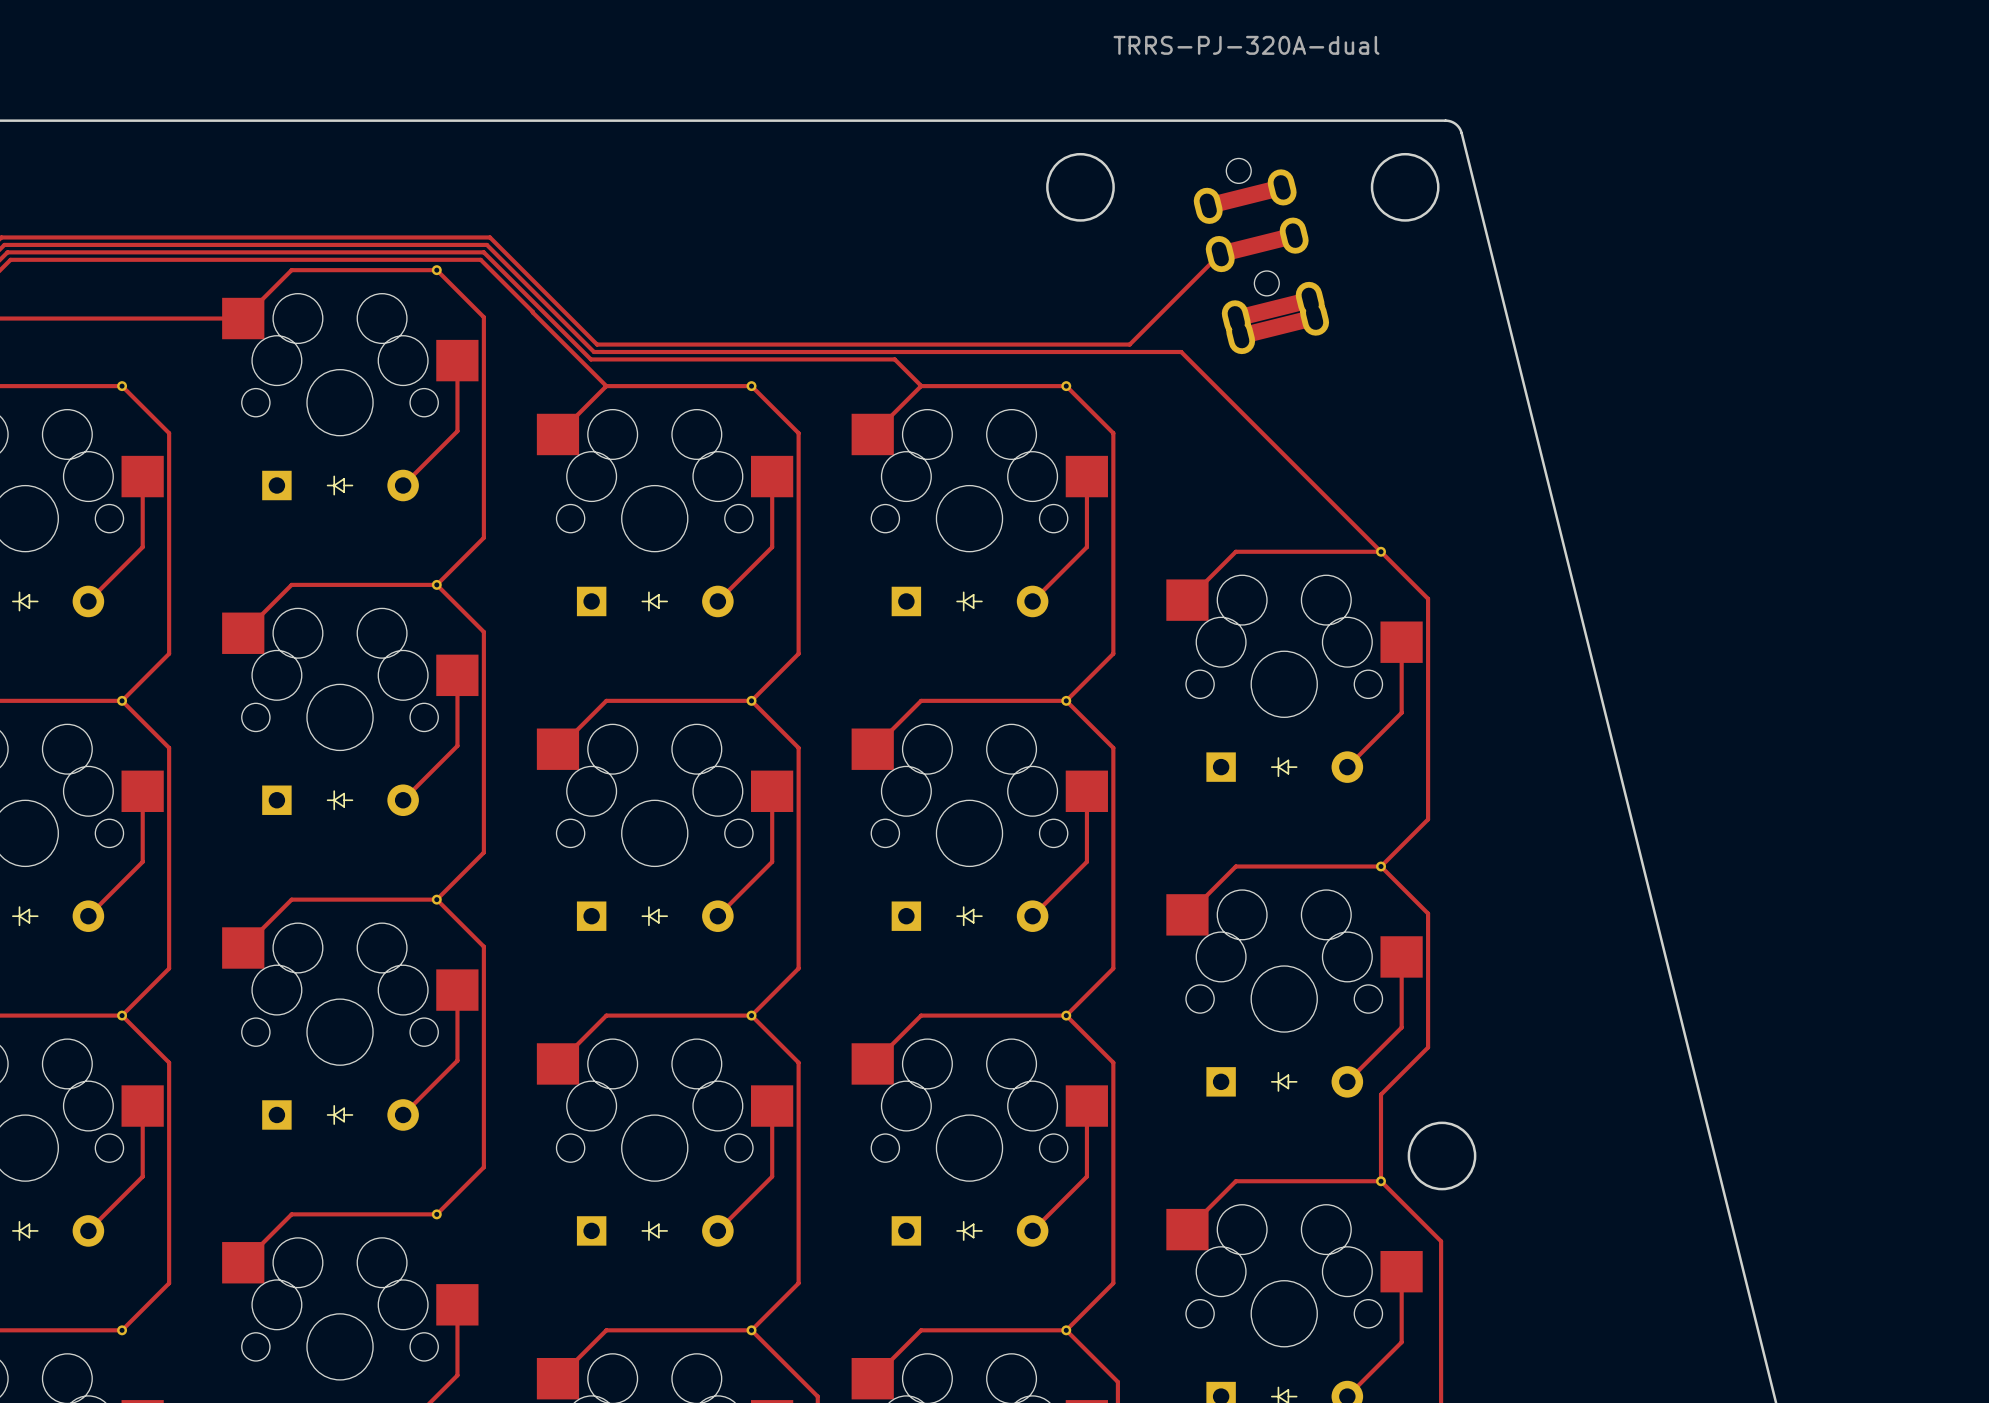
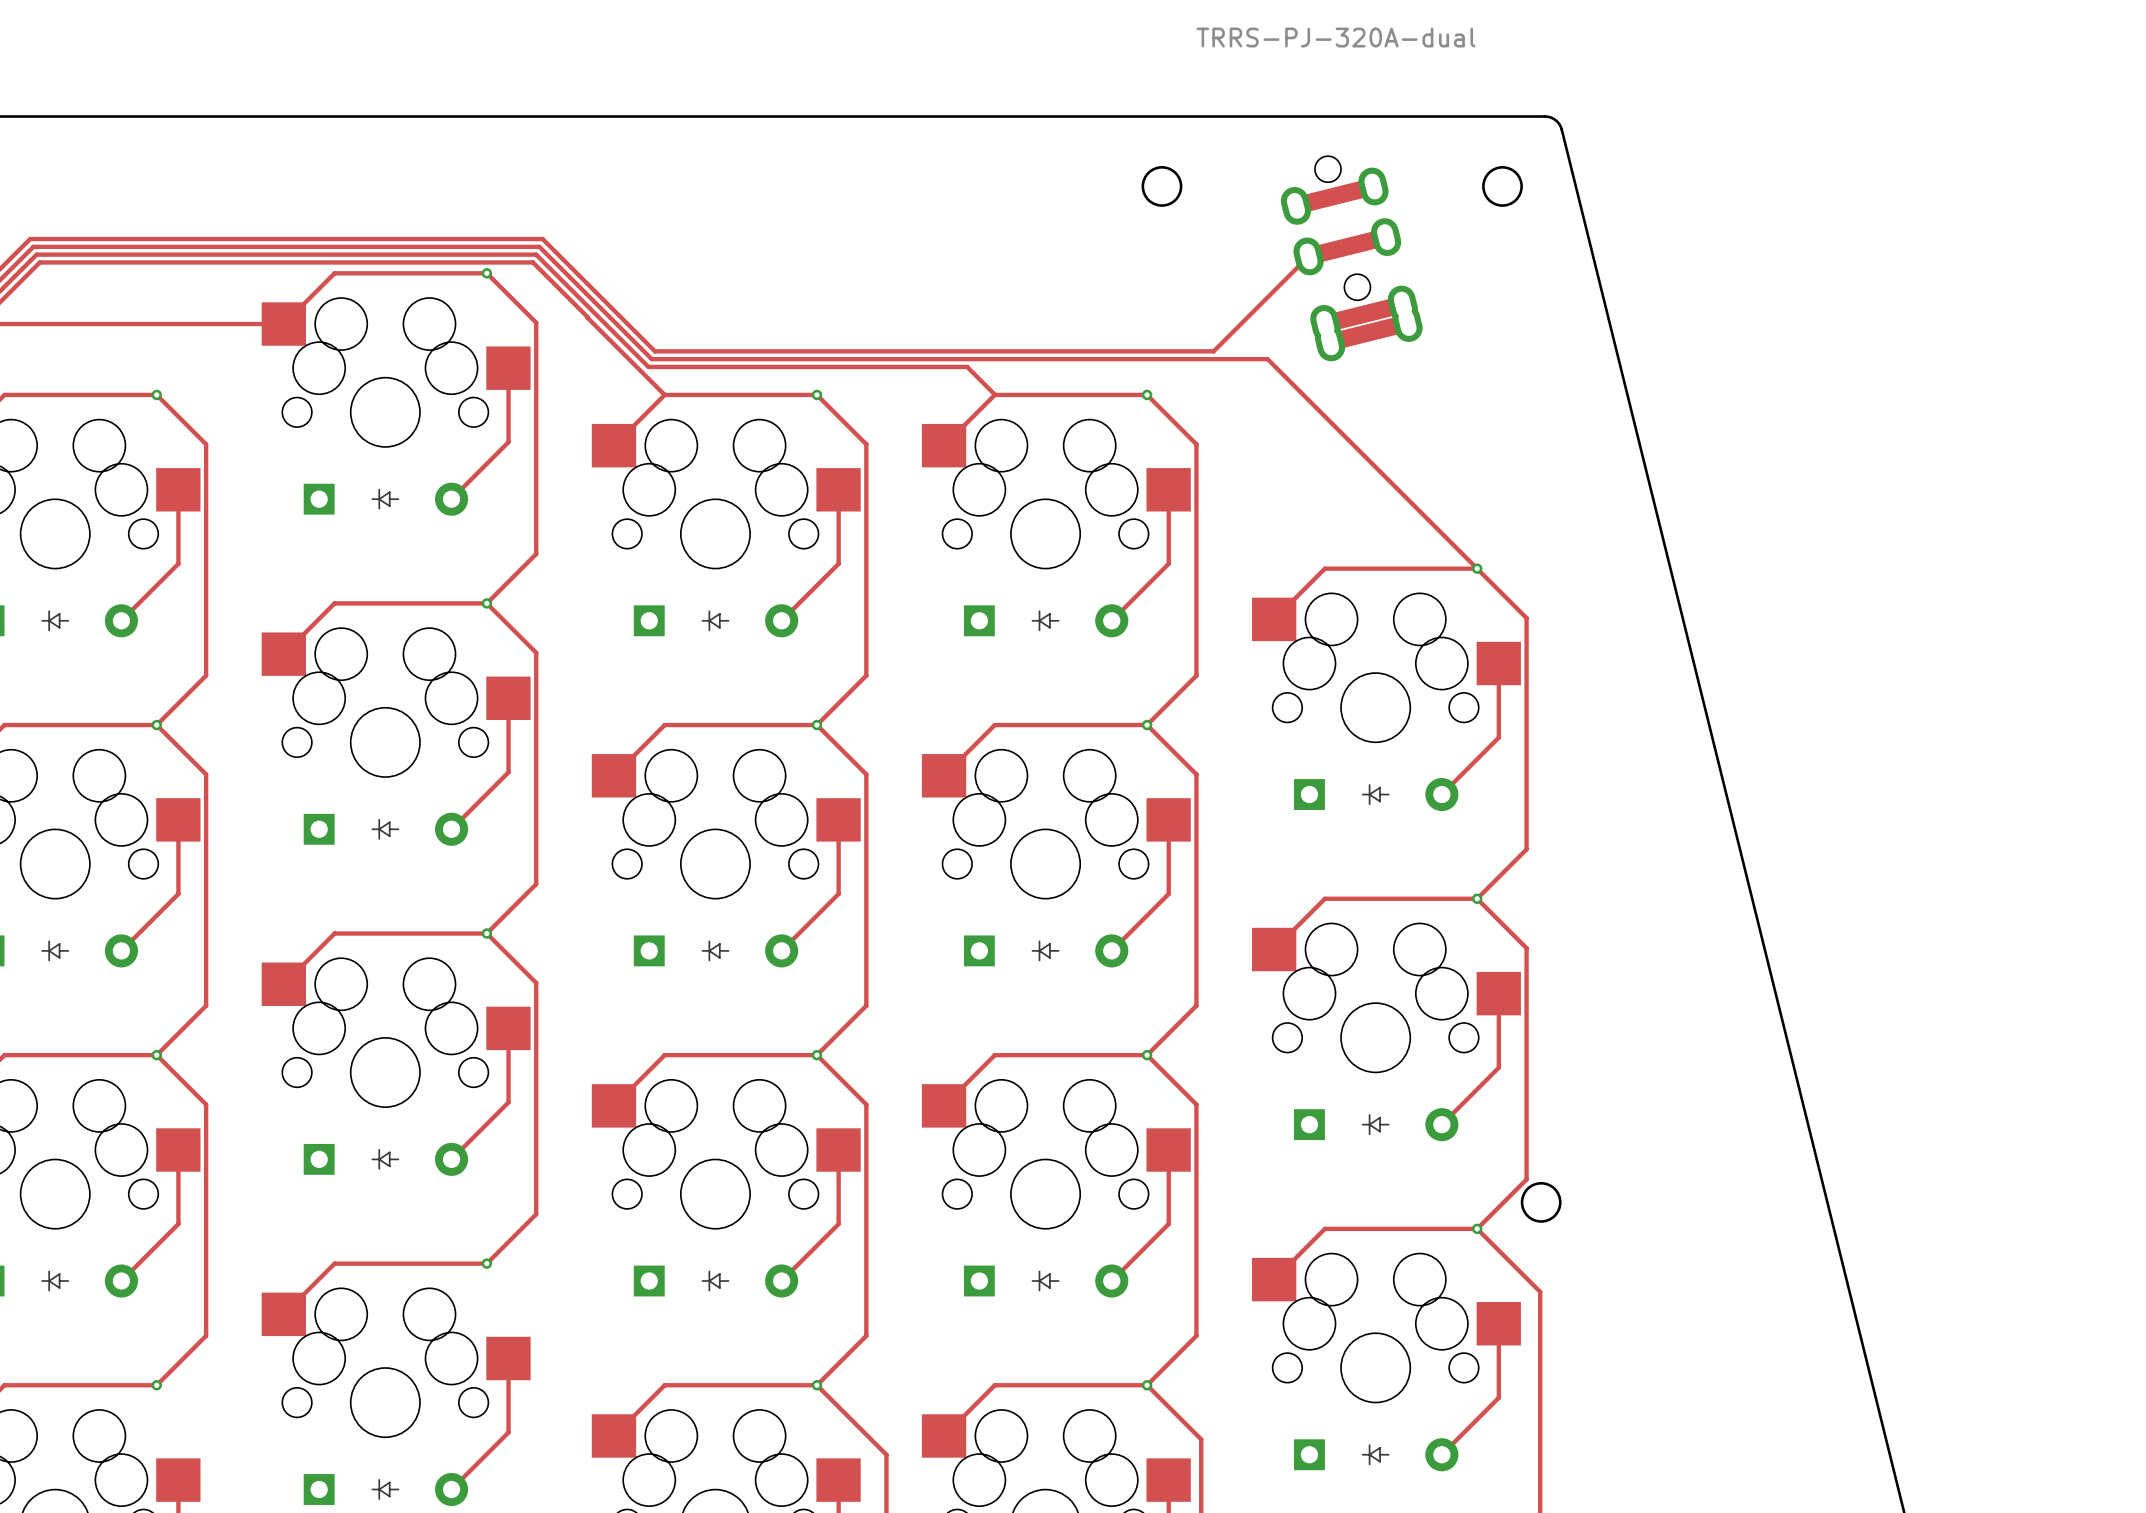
round board edge size: [1046, 152, 1115, 222] -> [1141, 166, 1183, 207]
round board edge size: [1370, 152, 1440, 222] -> [1482, 166, 1523, 207]
track: (1428, 1047) (1381, 1094) (1381, 1181) -> (1526, 1088) (1526, 1179) (1477, 1228)
round board edge size: [1407, 1121, 1477, 1191] -> [1520, 1181, 1562, 1223]

